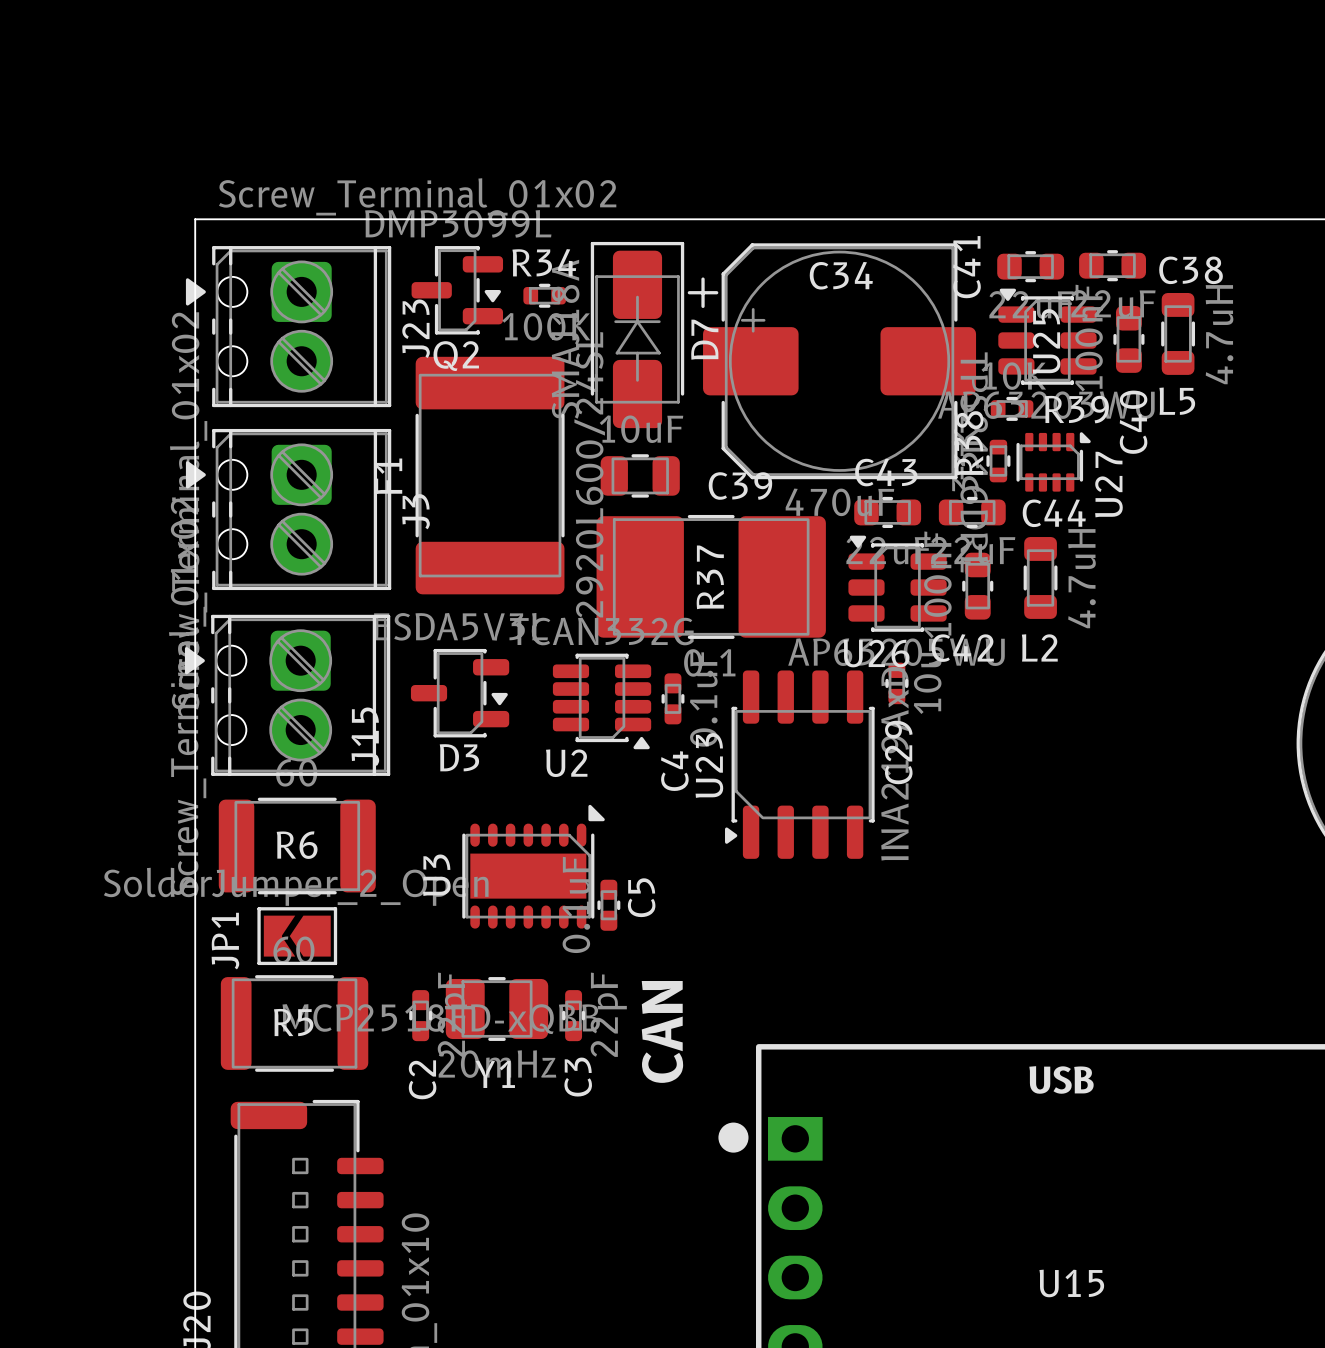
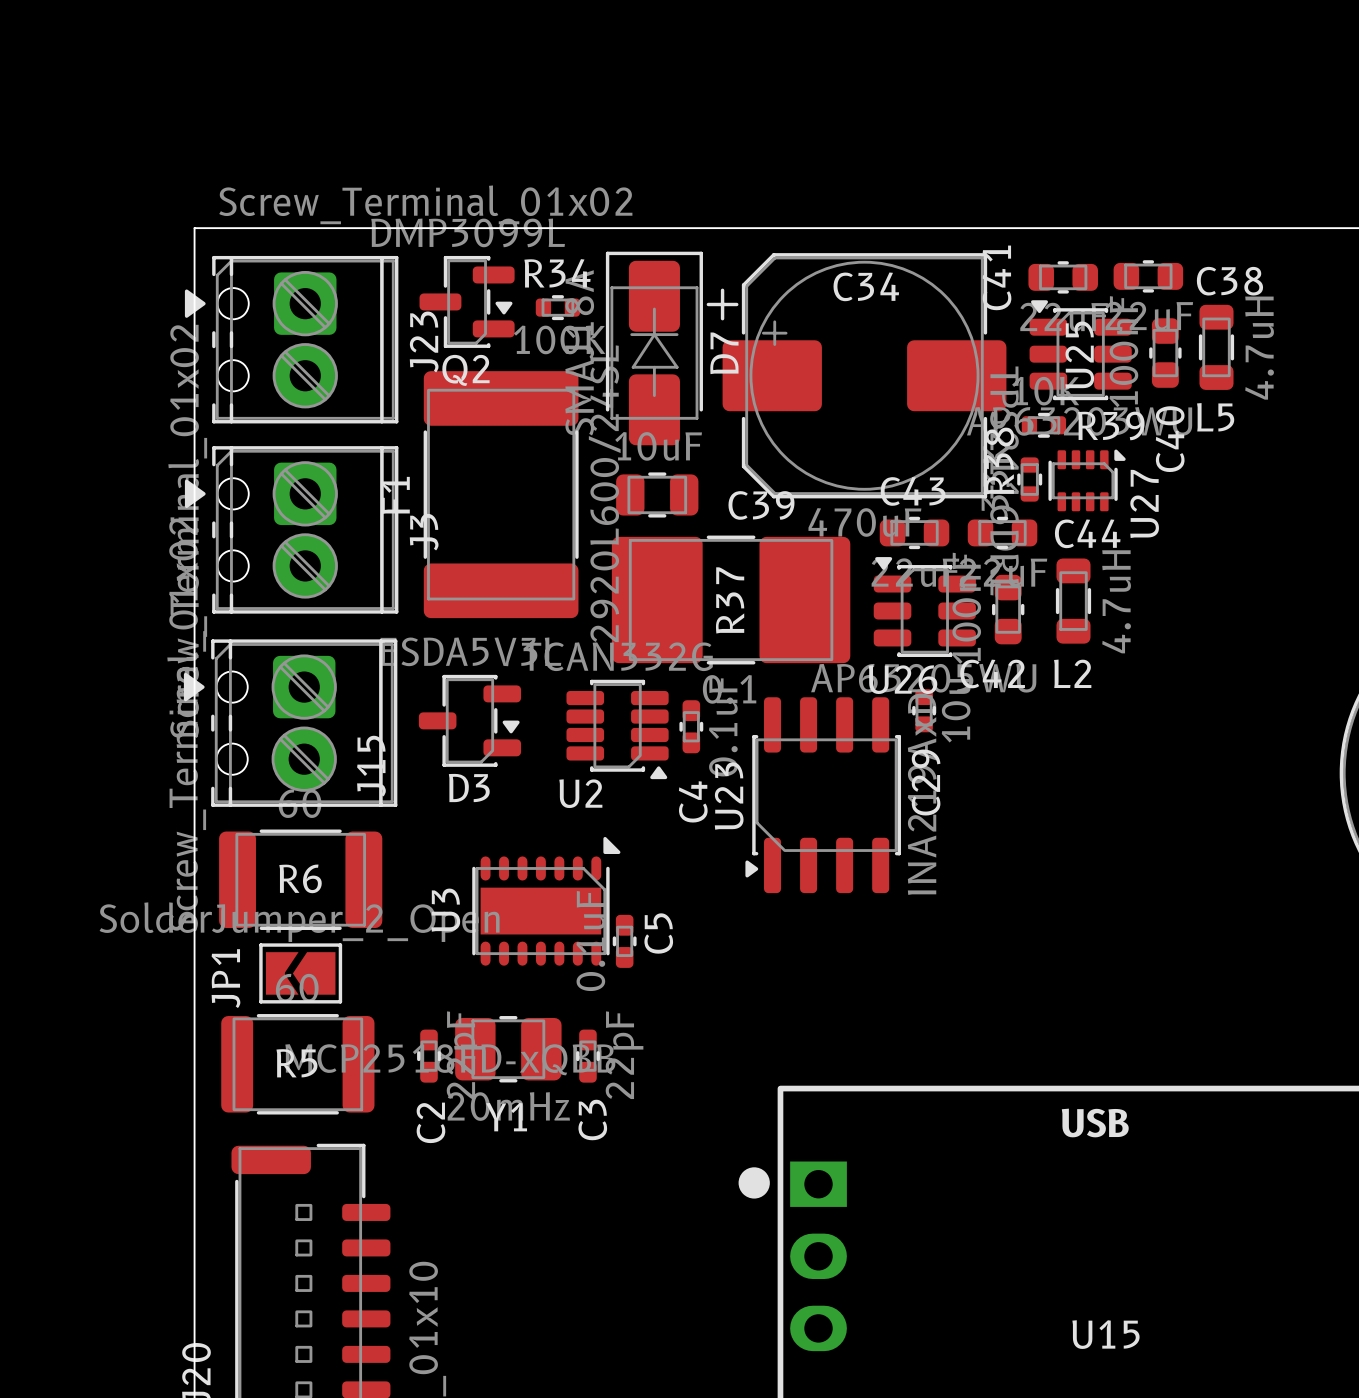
text: CAN (662, 1031) -> none

